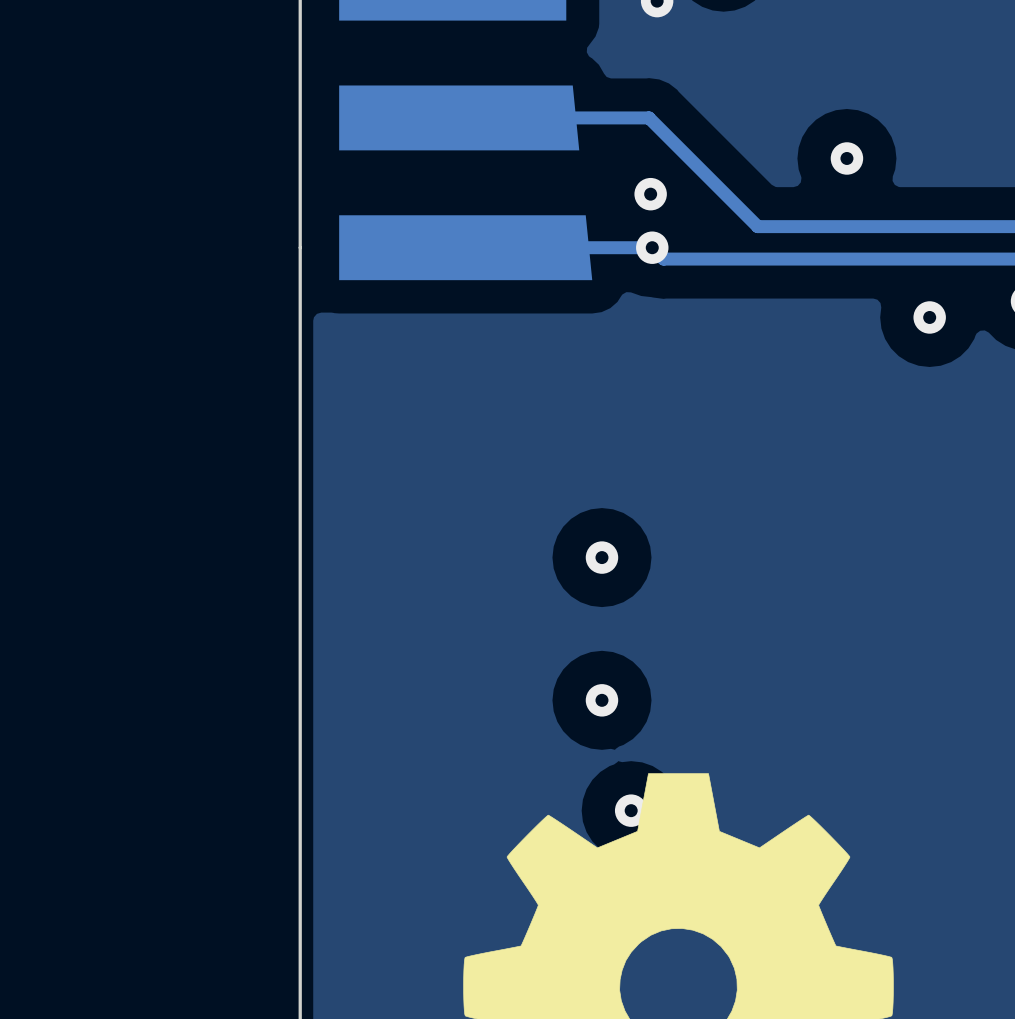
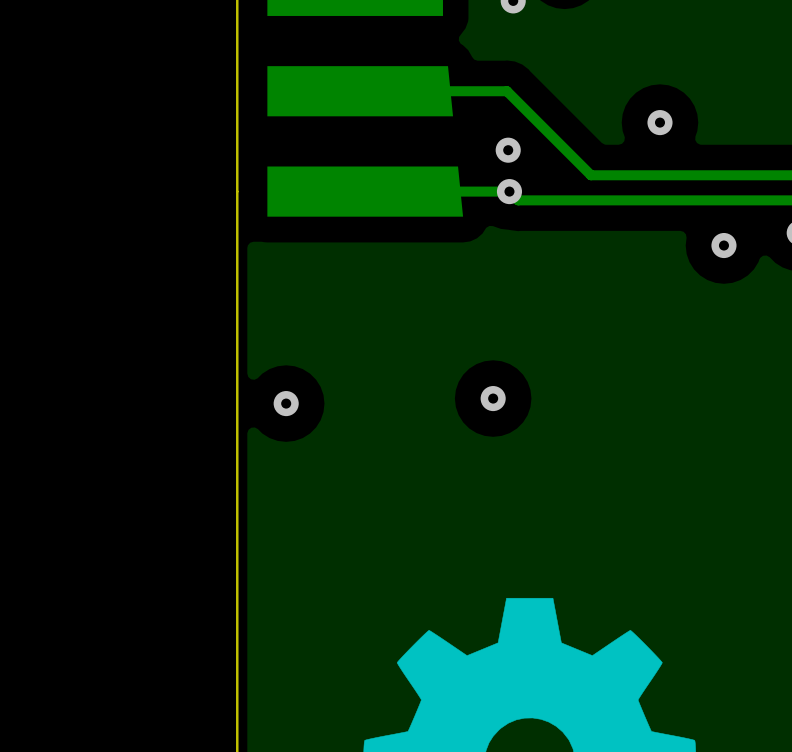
via: none -> (286, 403)
via position: (601, 557) -> (493, 398)
via: (601, 700) -> none
via: (631, 810) -> none

